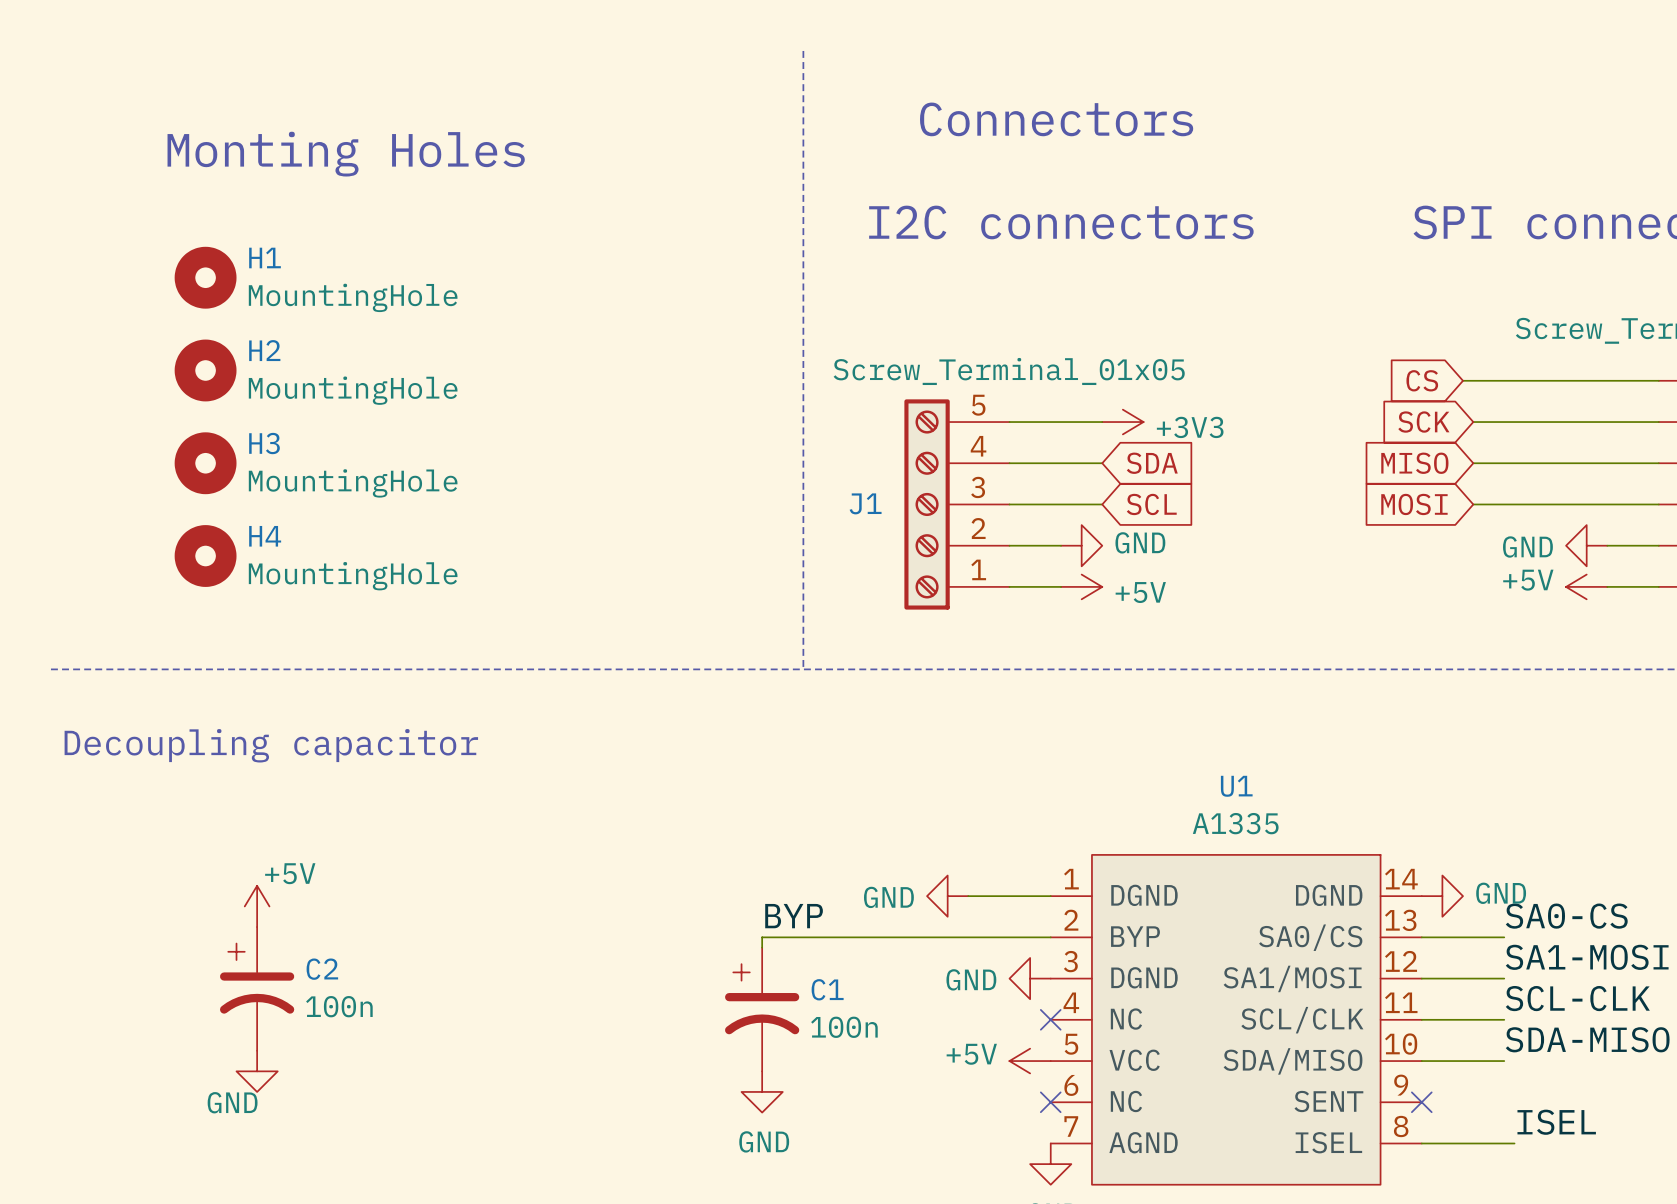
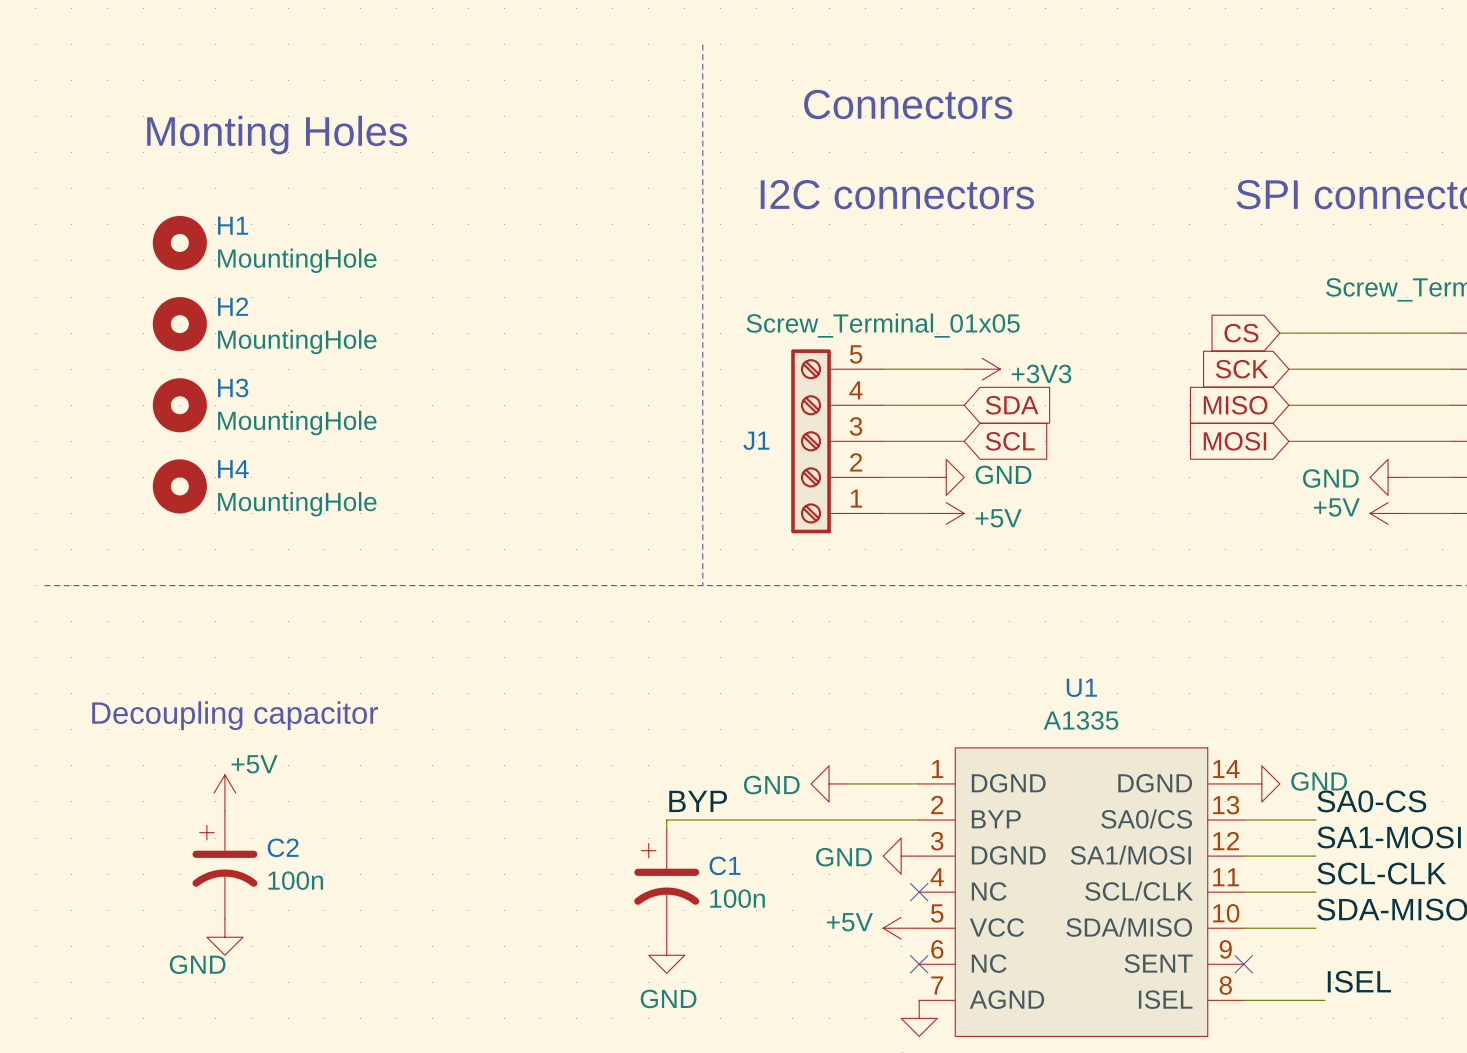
text position: Decoupling capacitor (271, 745) -> Decoupling capacitor (235, 715)

